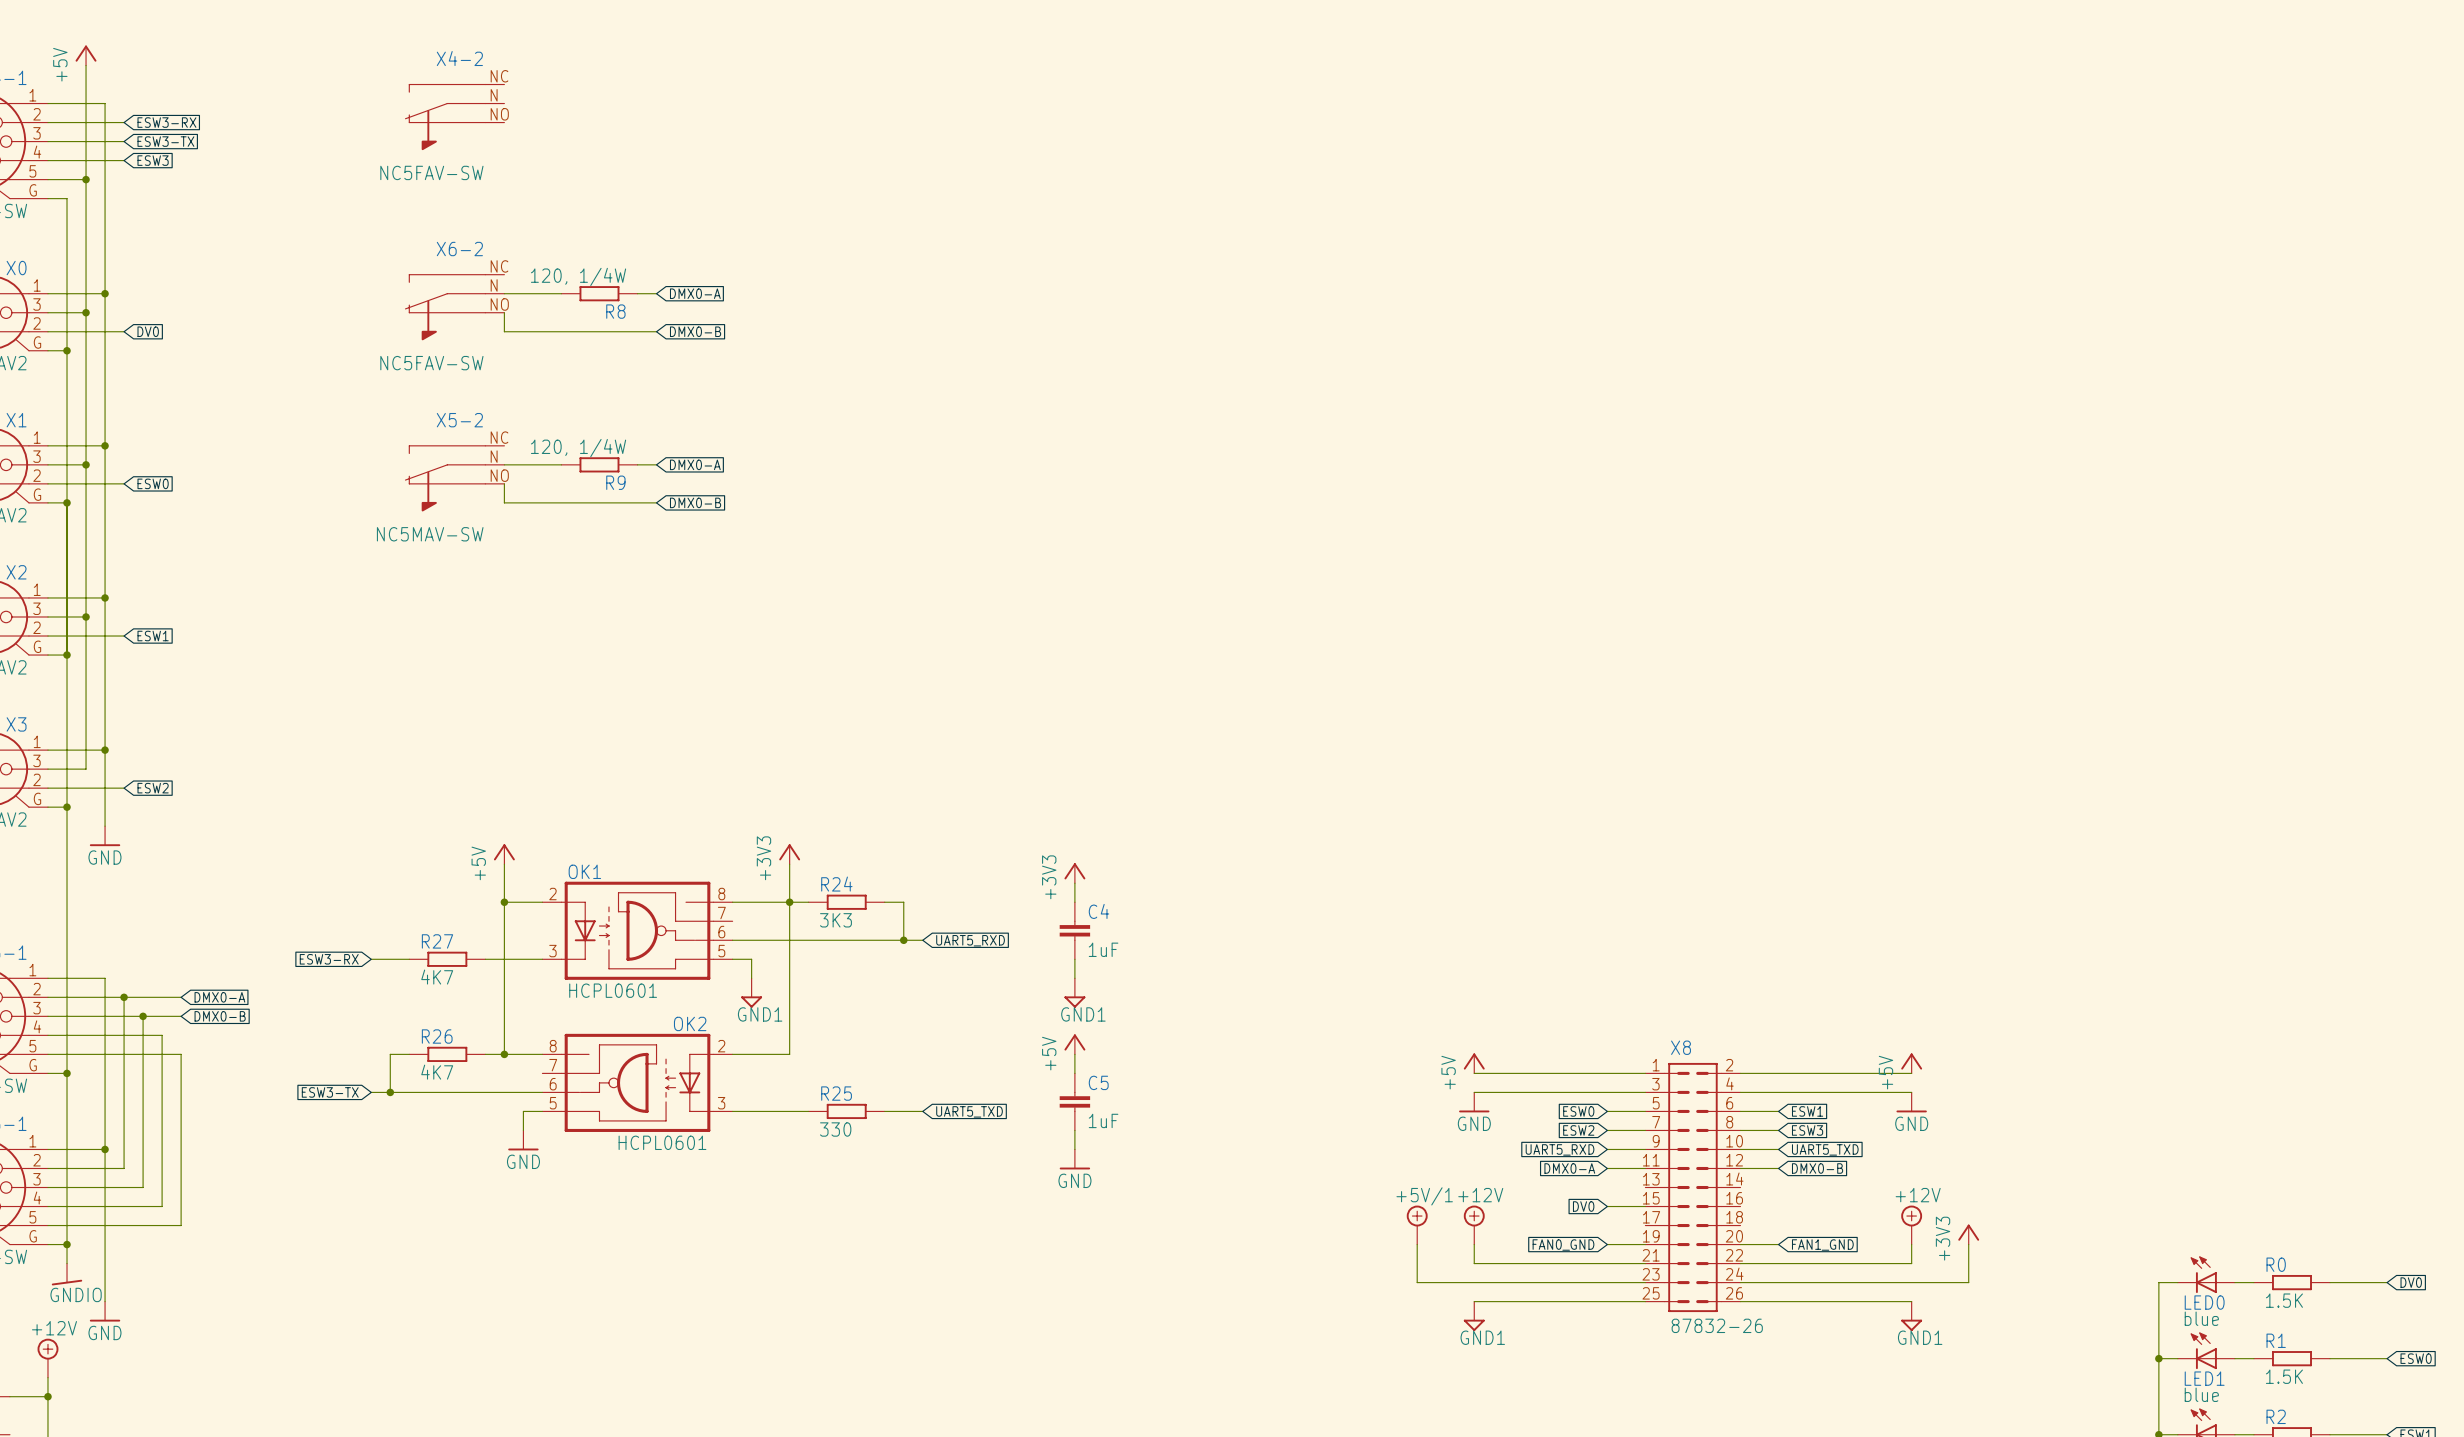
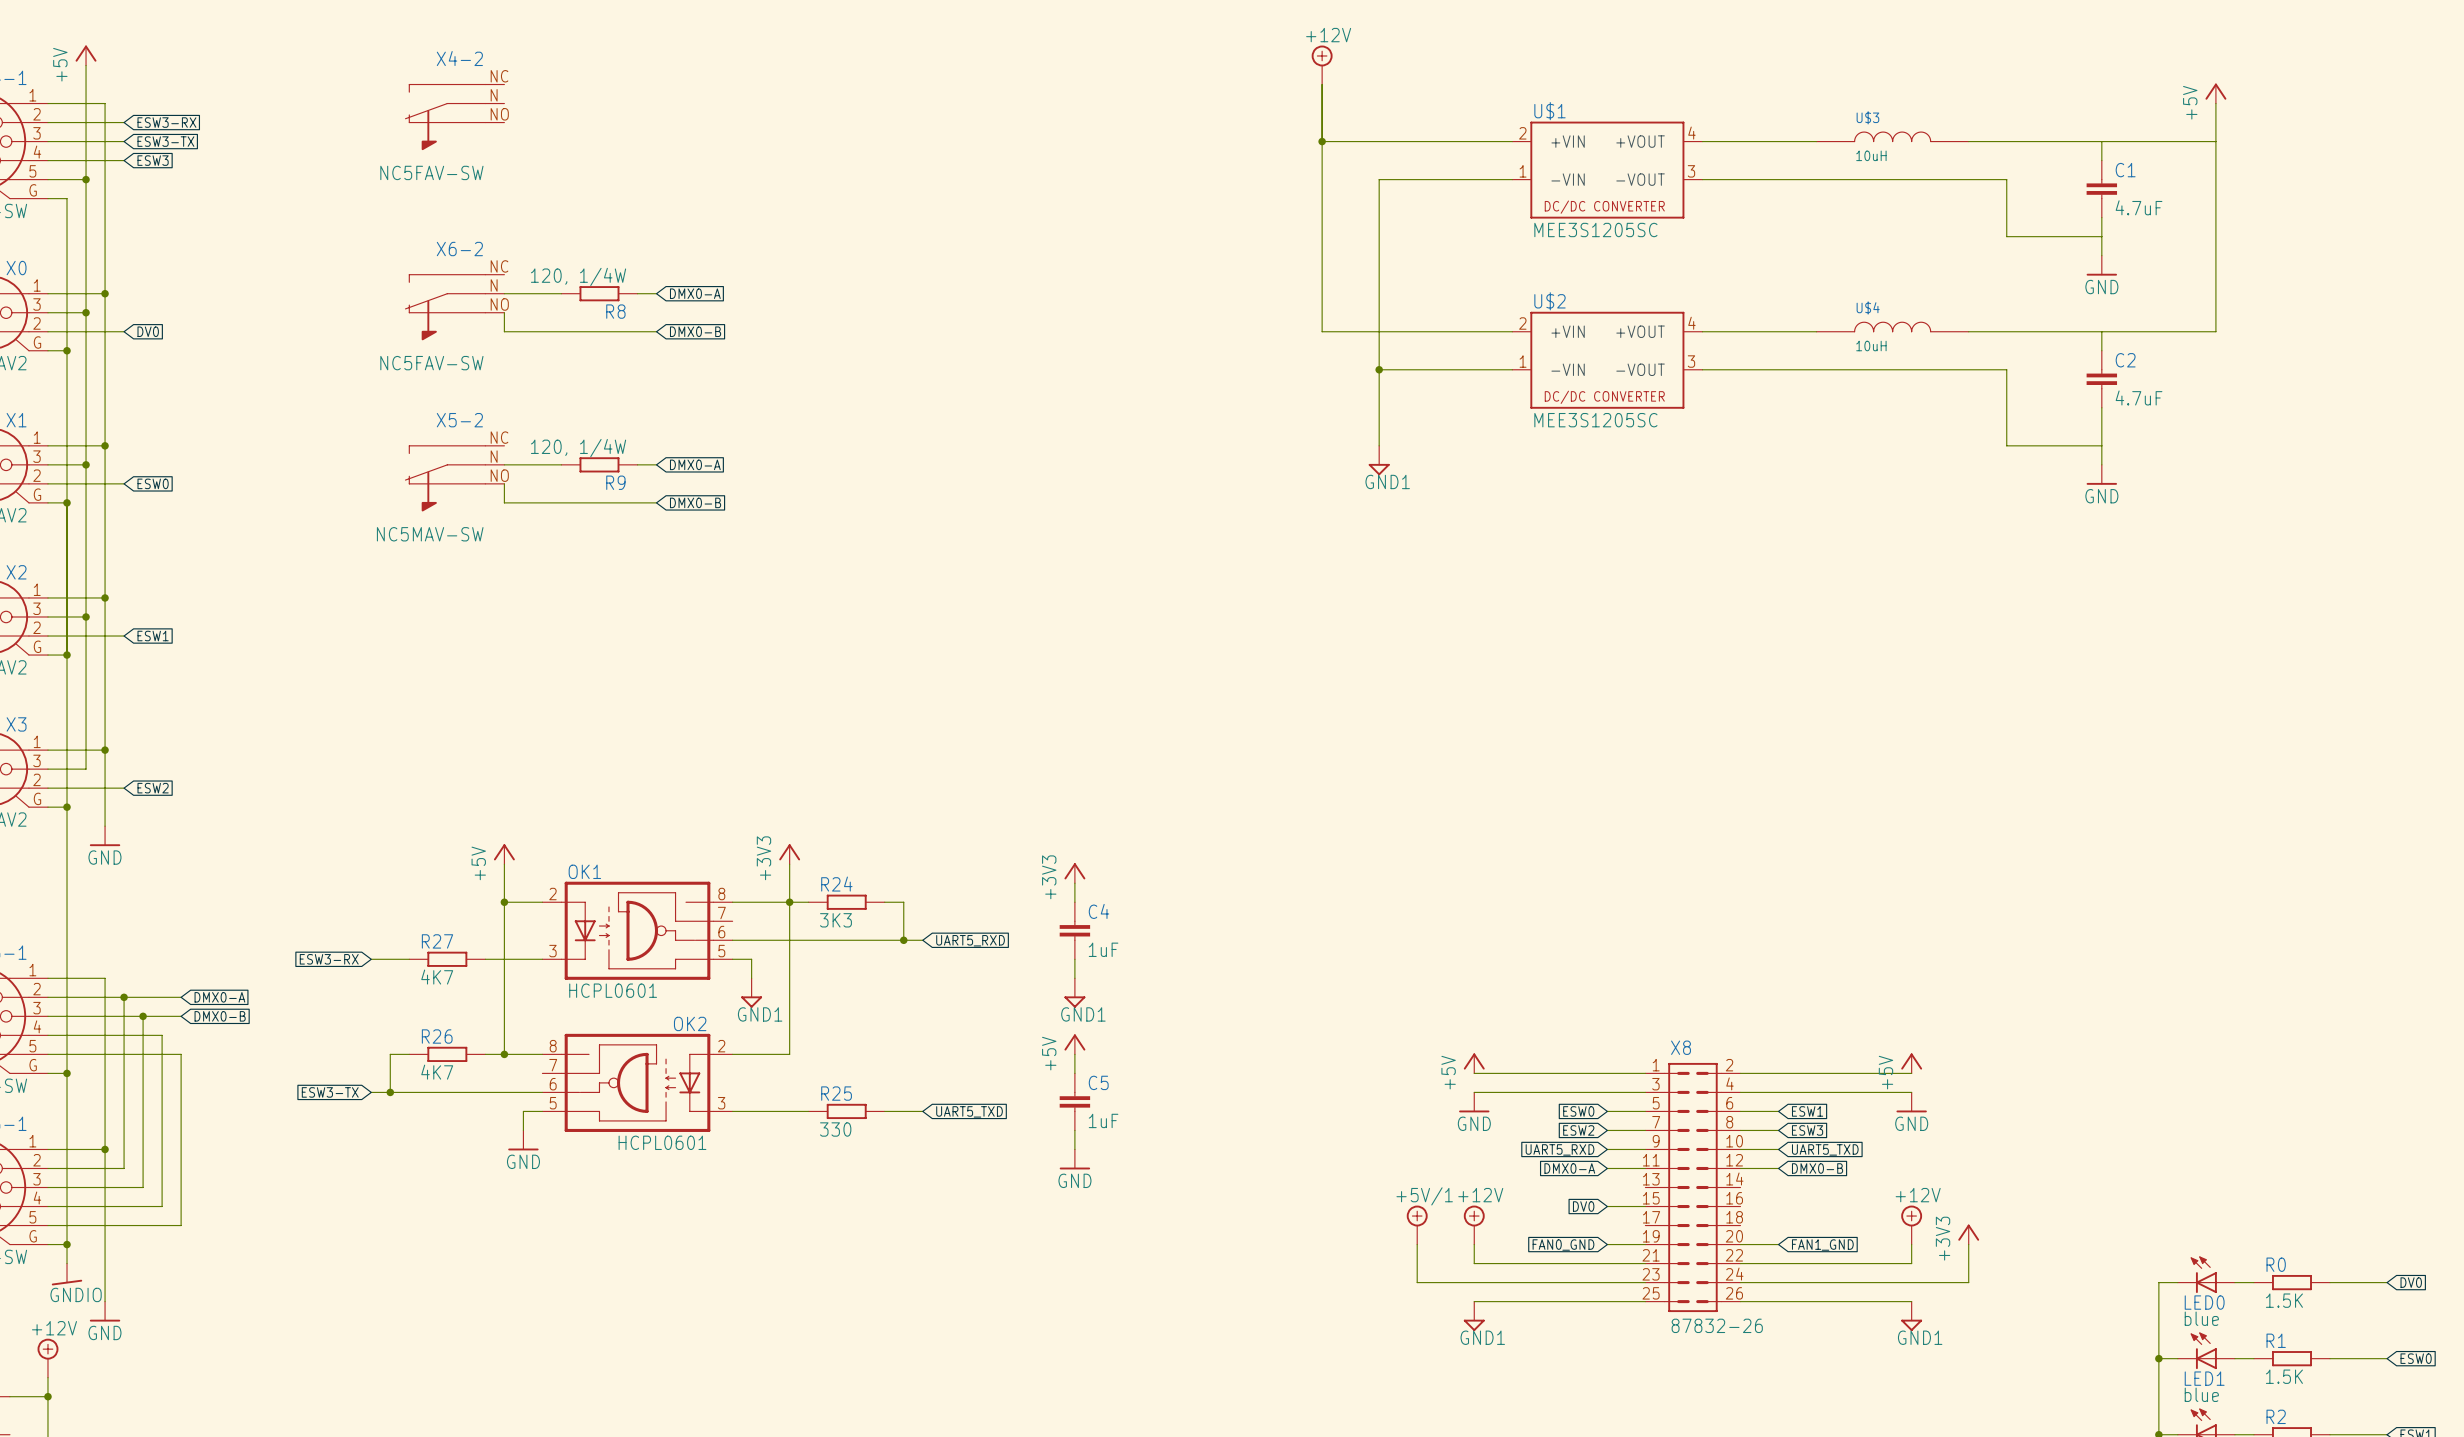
power symbol: none -> +12V (1322, 65)
wire: none -> (1322, 84) (1322, 331) (1512, 331)
power symbol: none -> +5V (2215, 93)
wire: none -> (2215, 103) (2215, 331) (1968, 331)
U$3: none -> 10uH (1892, 136)
wire: none -> (1322, 141) (1512, 141)
junction: none -> (1322, 141)
wire: none -> (1702, 141) (1816, 141)
wire: none -> (1968, 141) (2215, 141)
wire: none -> (2101, 141) (2101, 160)
U$1: none -> MEE3S1205SC (1607, 170)
wire: none -> (1512, 179) (1379, 179) (1379, 445)
wire: none -> (1702, 179) (2006, 179) (2006, 236) (2101, 236)
C1: none -> 4.7uF (2101, 189)
wire: none -> (2101, 217) (2101, 255)
power symbol: none -> GND (2101, 265)
U$4: none -> 10uH (1892, 326)
wire: none -> (1702, 331) (1816, 331)
wire: none -> (2101, 331) (2101, 350)
U$2: none -> MEE3S1205SC (1607, 360)
wire: none -> (1379, 369) (1512, 369)
junction: none -> (1379, 369)
wire: none -> (1702, 369) (2006, 369) (2006, 445) (2101, 445)
C2: none -> 4.7uF (2101, 379)
wire: none -> (2101, 407) (2101, 464)
power symbol: none -> GND1 (1379, 460)
power symbol: none -> GND (2101, 474)

